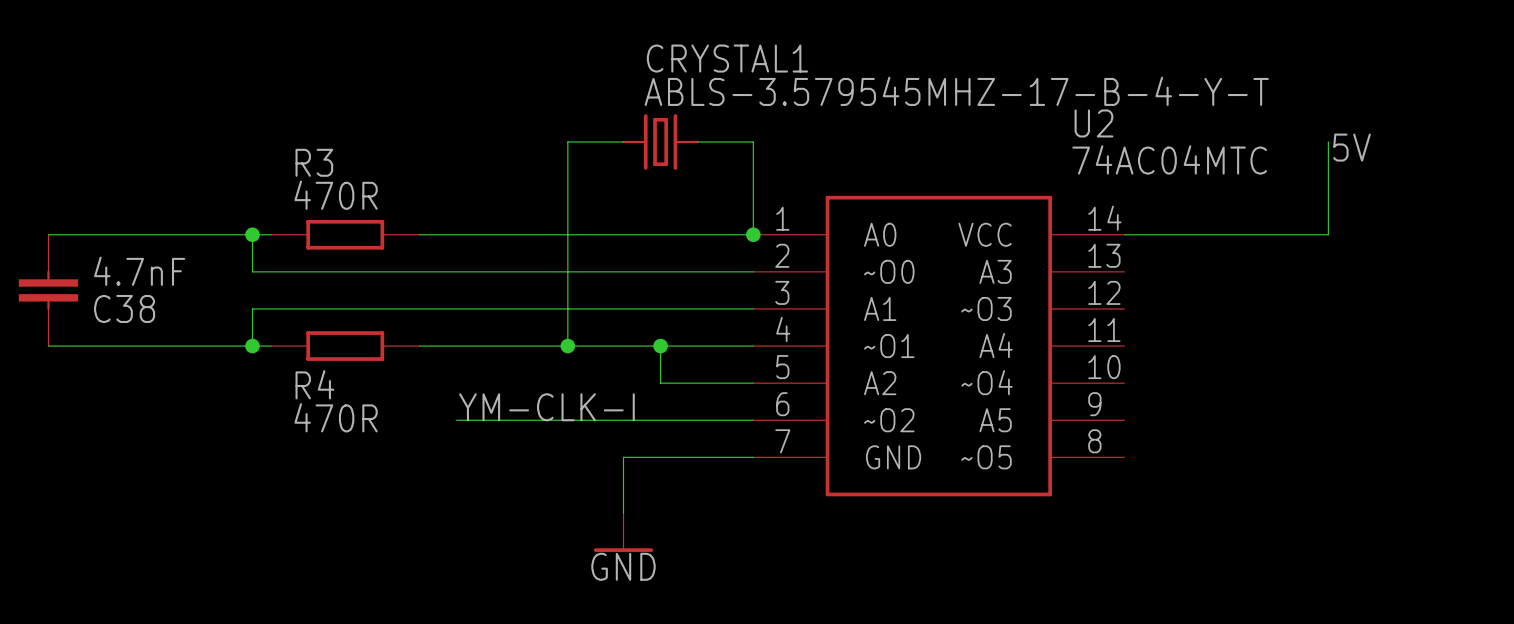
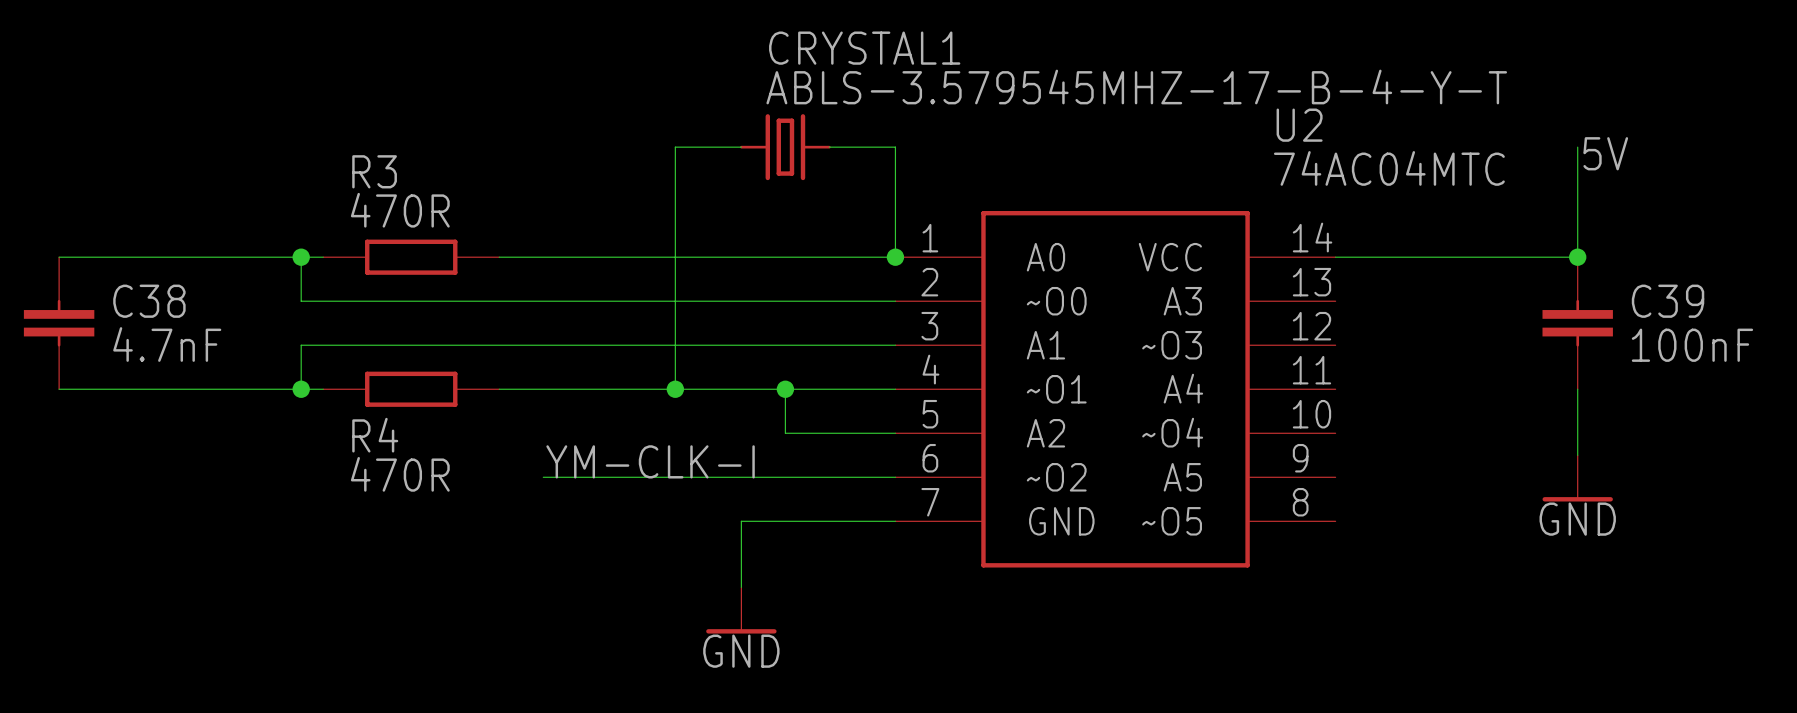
junction: none -> (1577, 257)
C38 value position: 4.7nF (139, 271) -> 4.7nF (167, 344)
C39: none -> 100nF (1577, 323)
C38 name position: C38 (124, 308) -> C38 (149, 301)
wire: none -> (1577, 389) (1577, 455)
power symbol: none -> GND (1577, 478)

